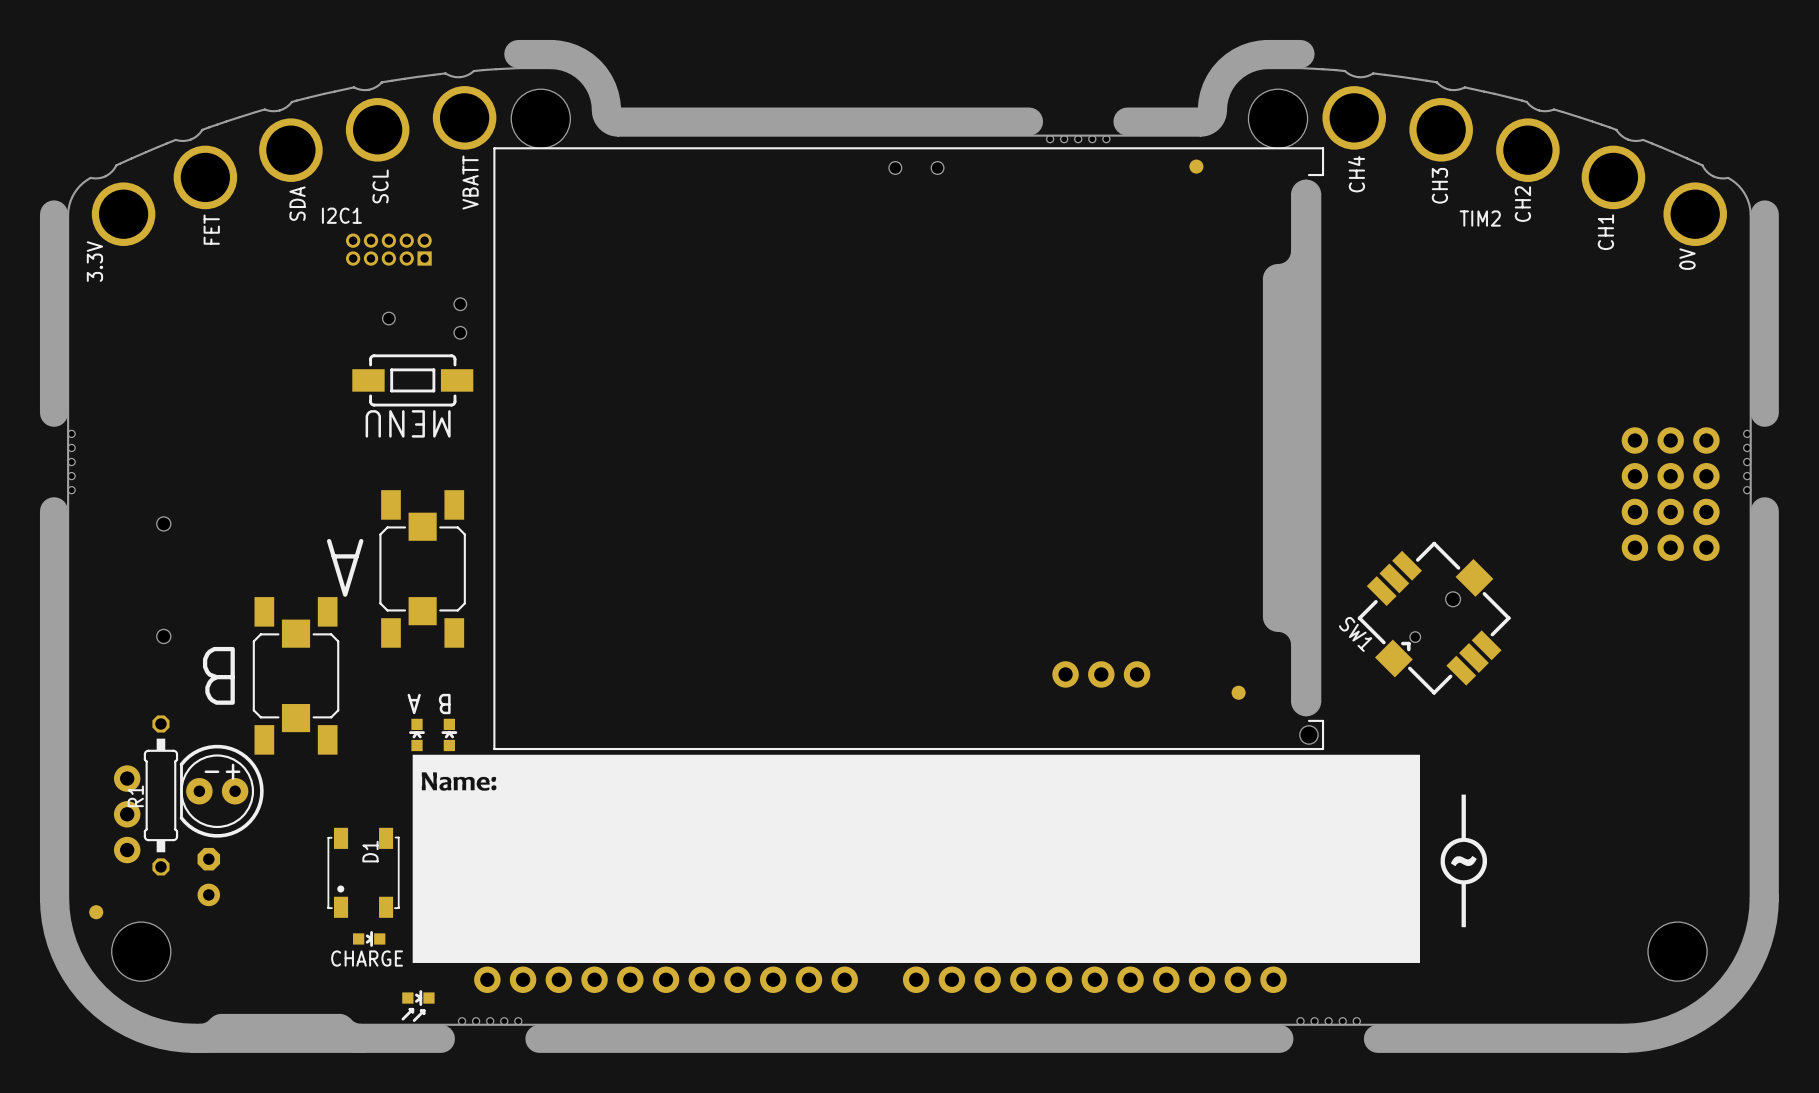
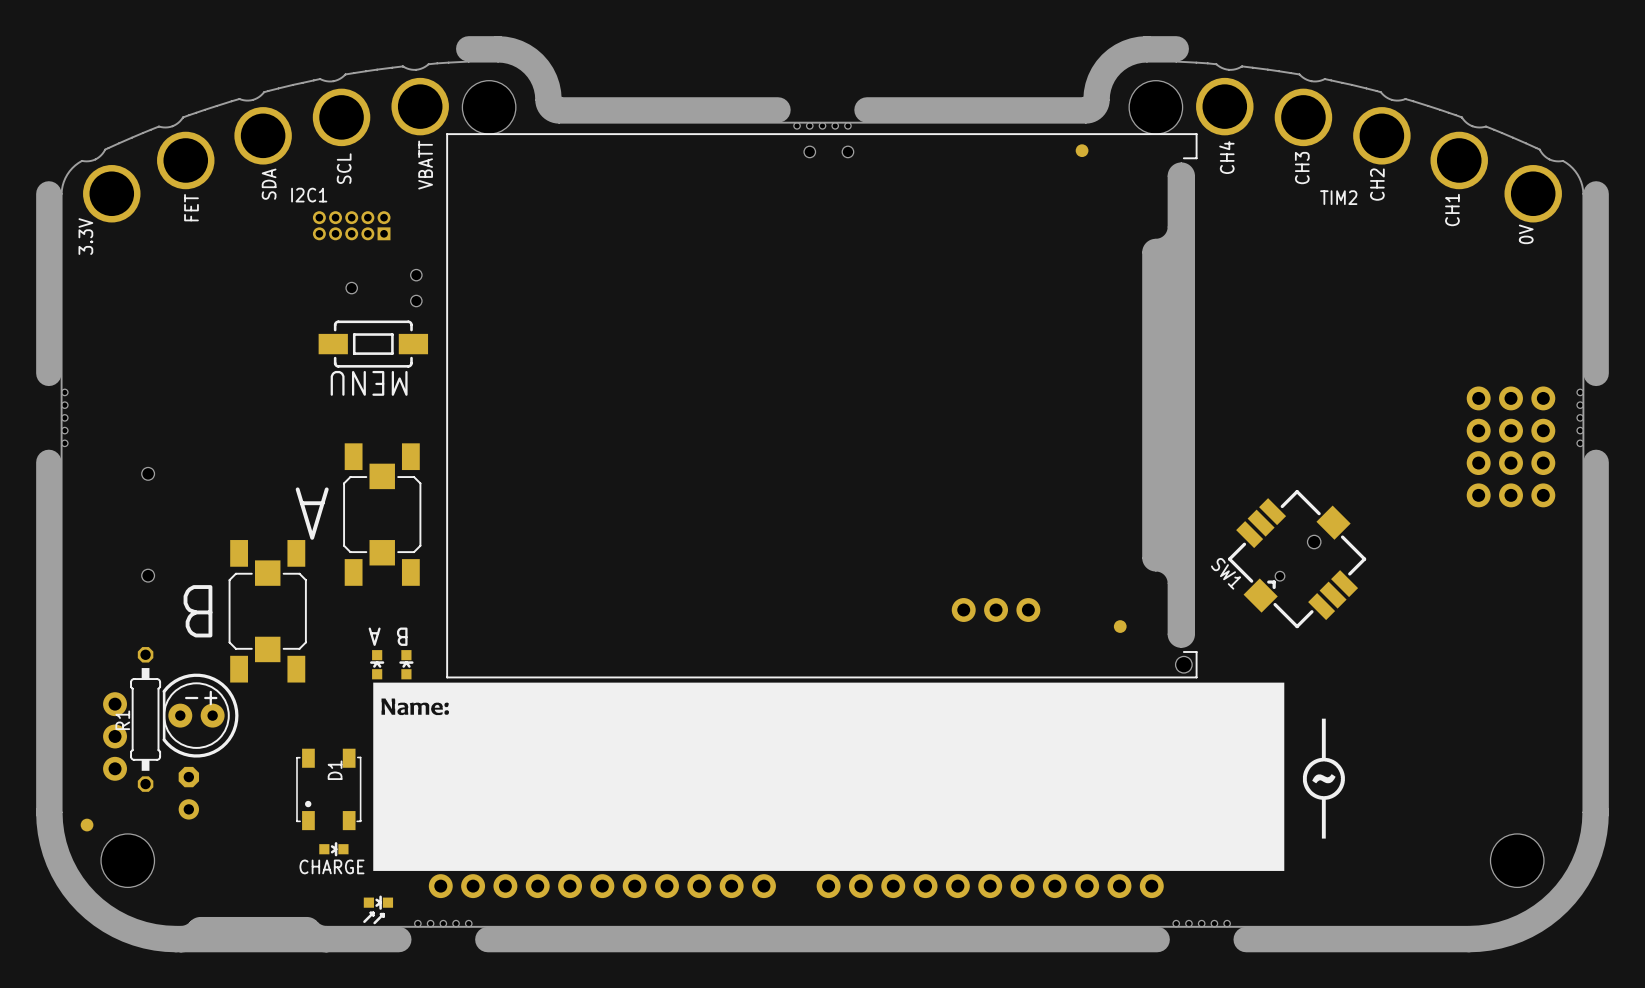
part footprint: [39, 39, 1779, 1053] -> [36, 36, 1609, 953]

